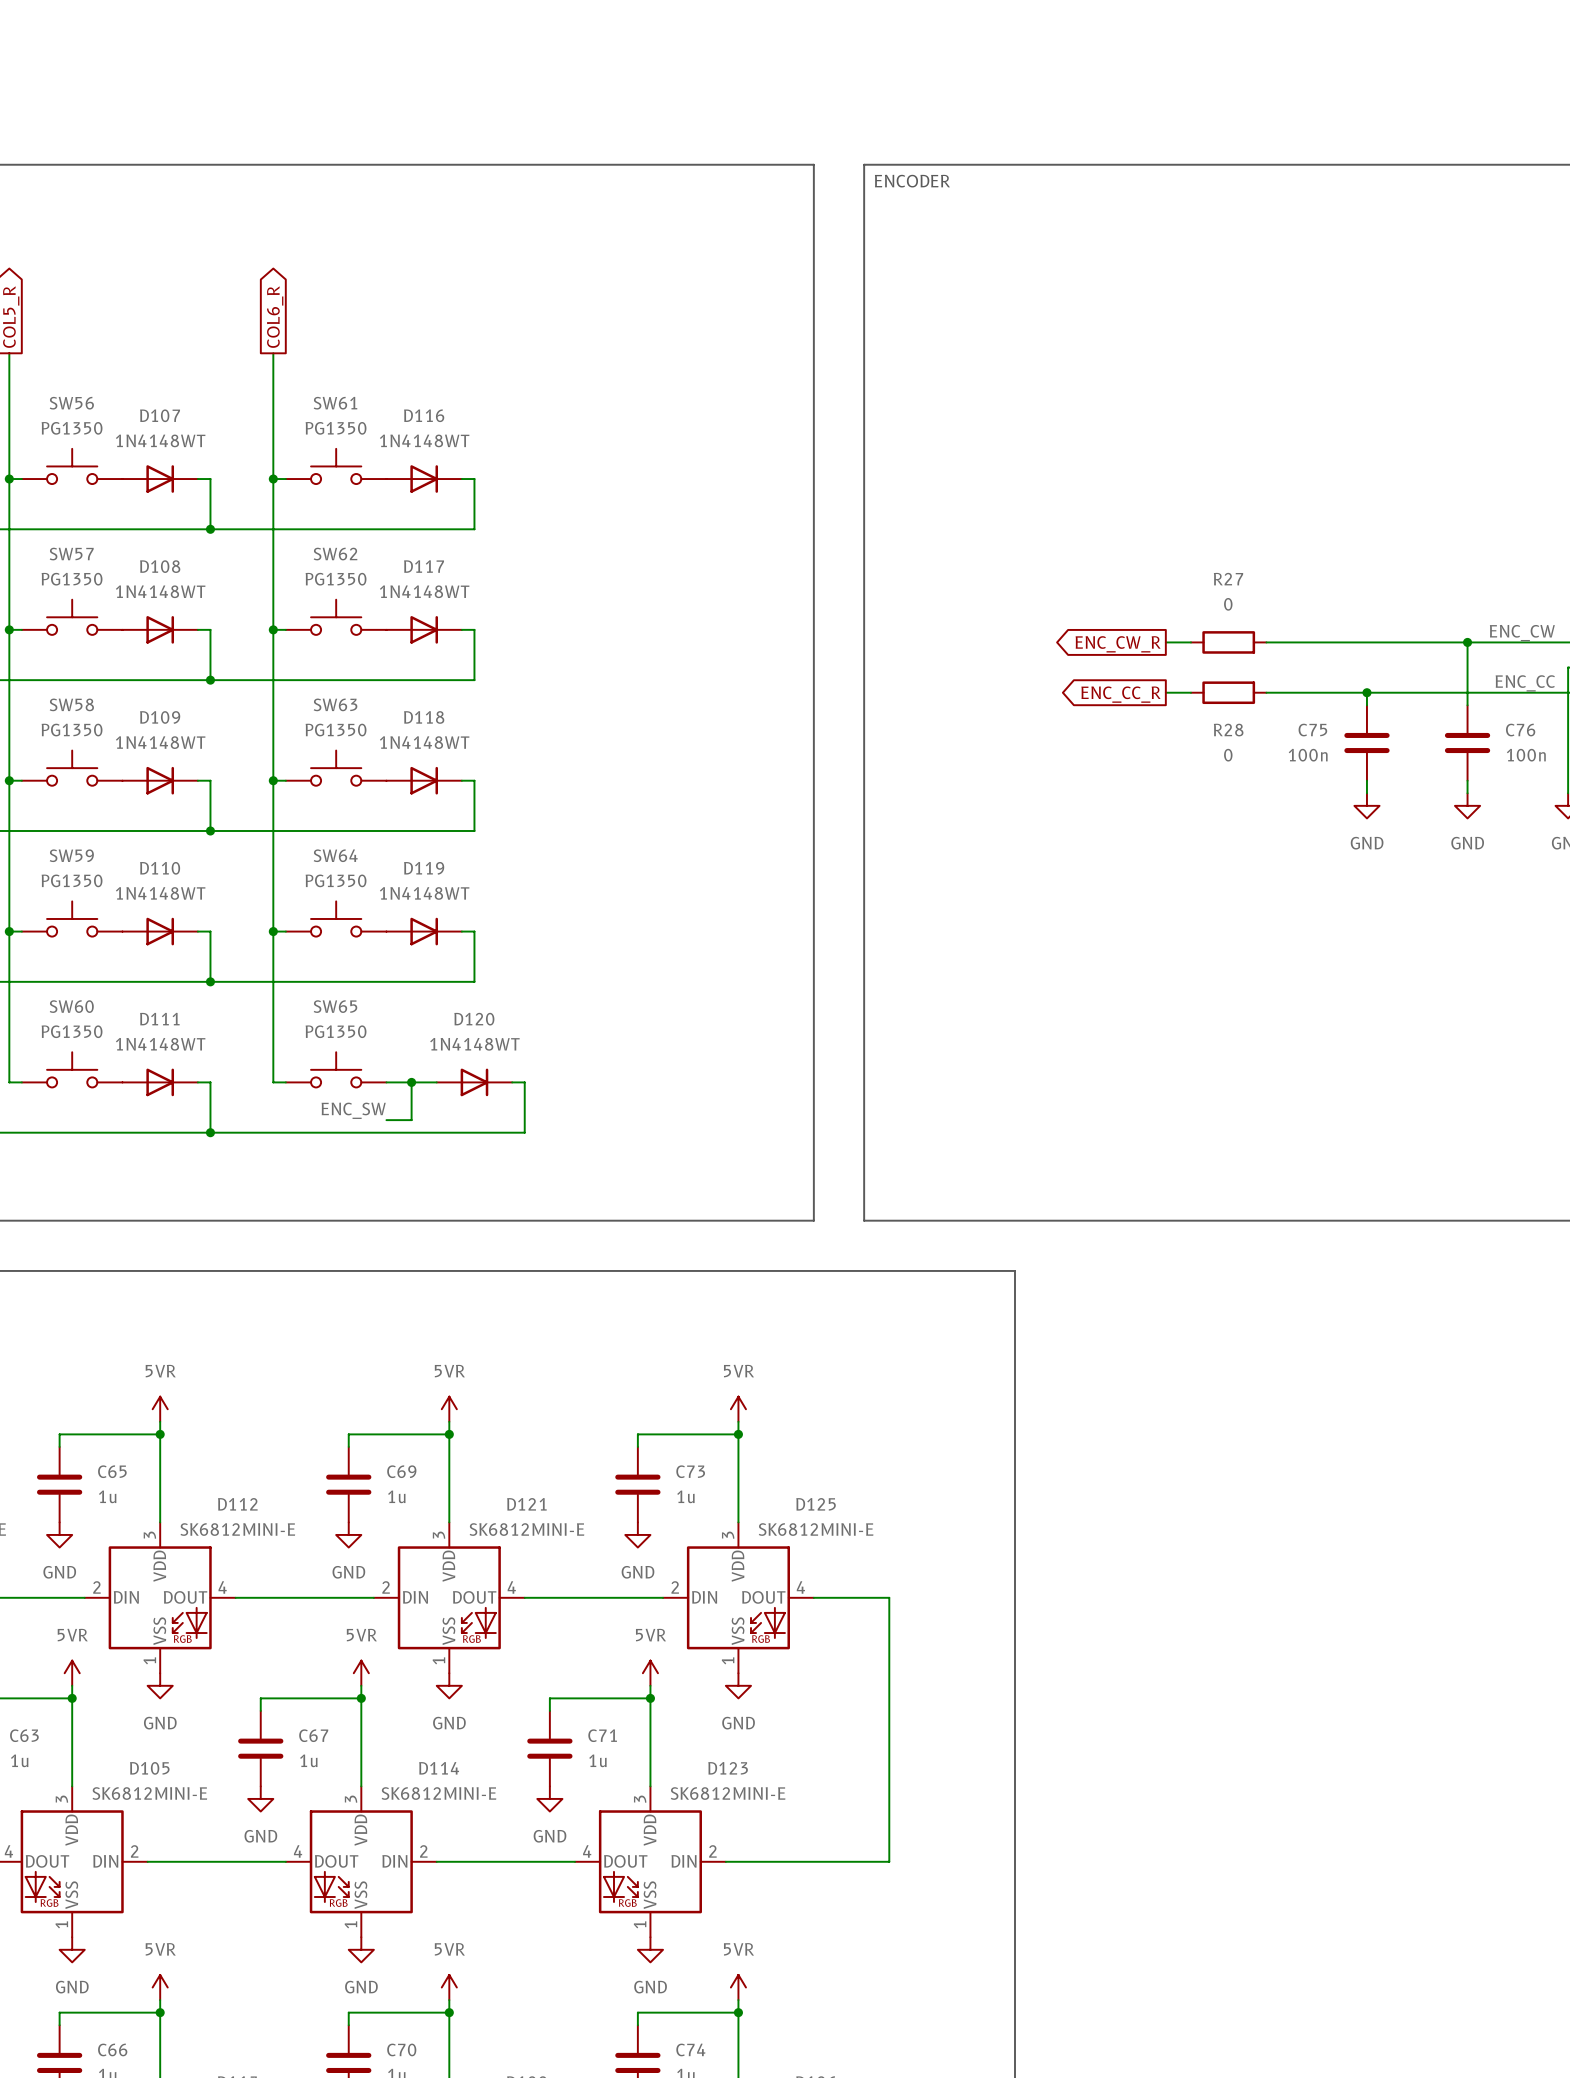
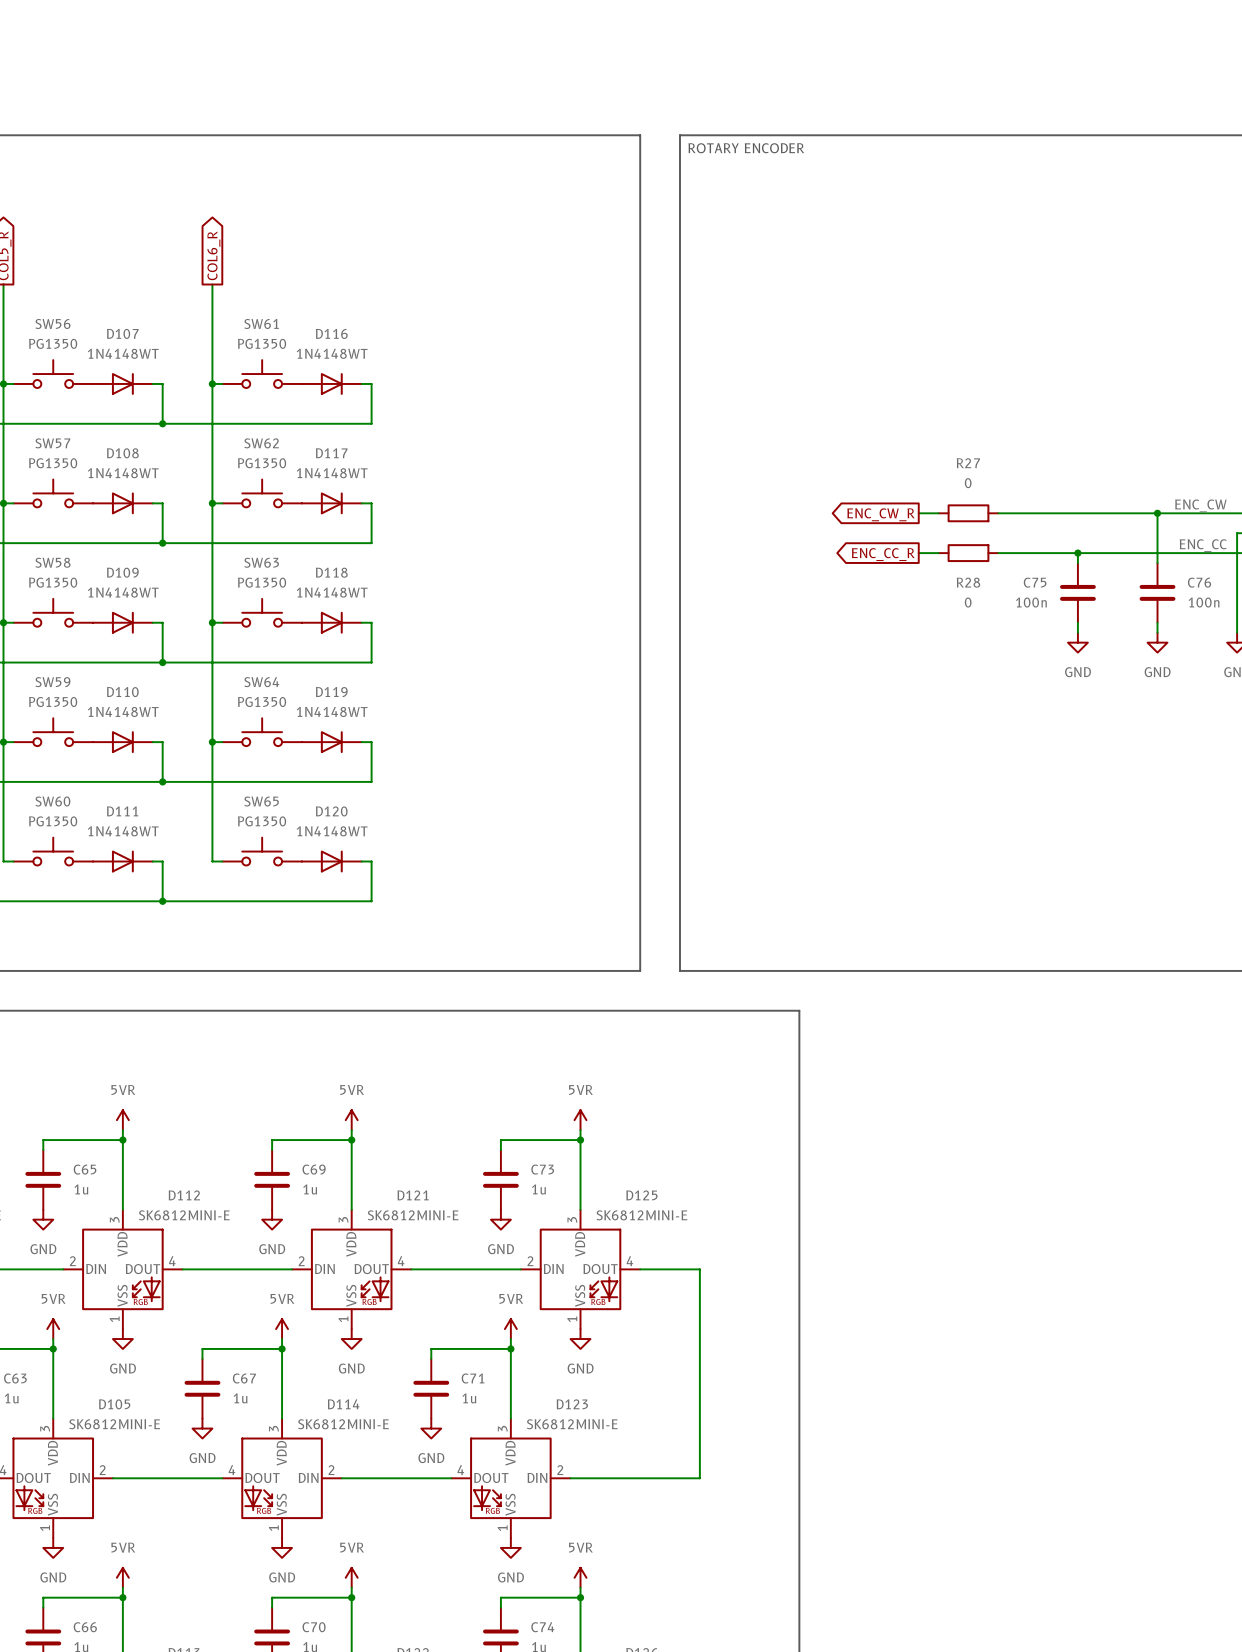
text: ENCODER (912, 181) -> ROTARY ENCODER (746, 148)
wire: (411, 1082) (411, 1120) (386, 1120) -> none
junction: (411, 1082) -> none
D120 position: (474, 1082) -> (331, 861)
wire: (512, 1082) (524, 1082) (524, 1132) (474, 1132) -> (361, 861) (371, 861) (371, 901)
label: ENC_SW (353, 1110) -> none

